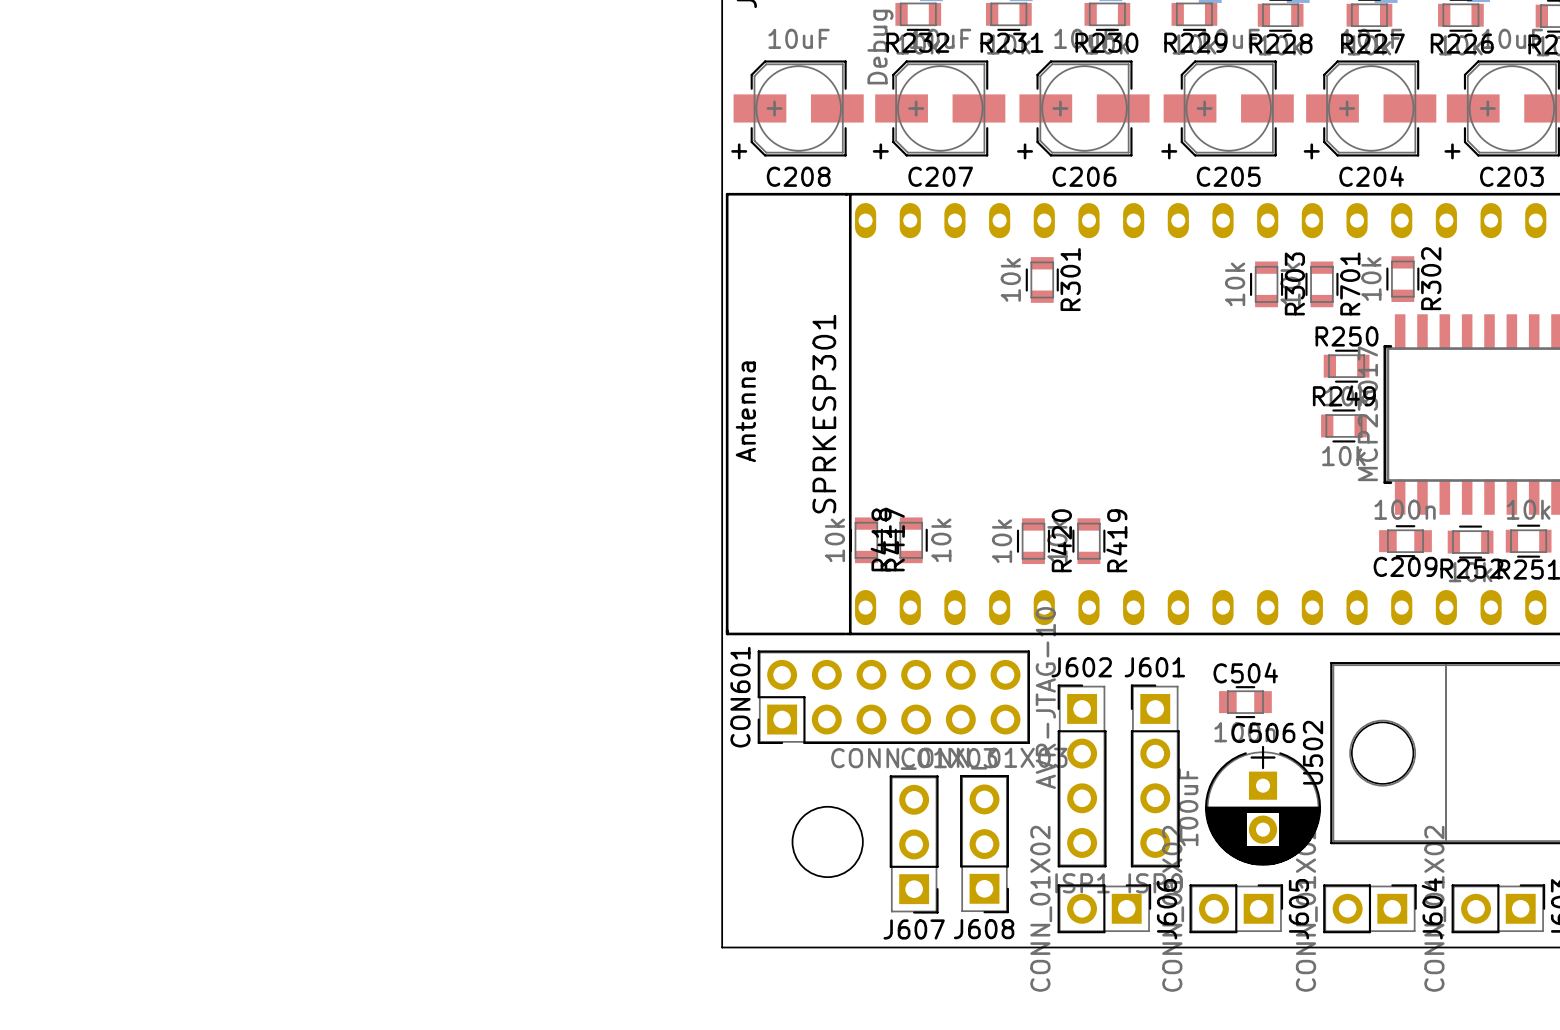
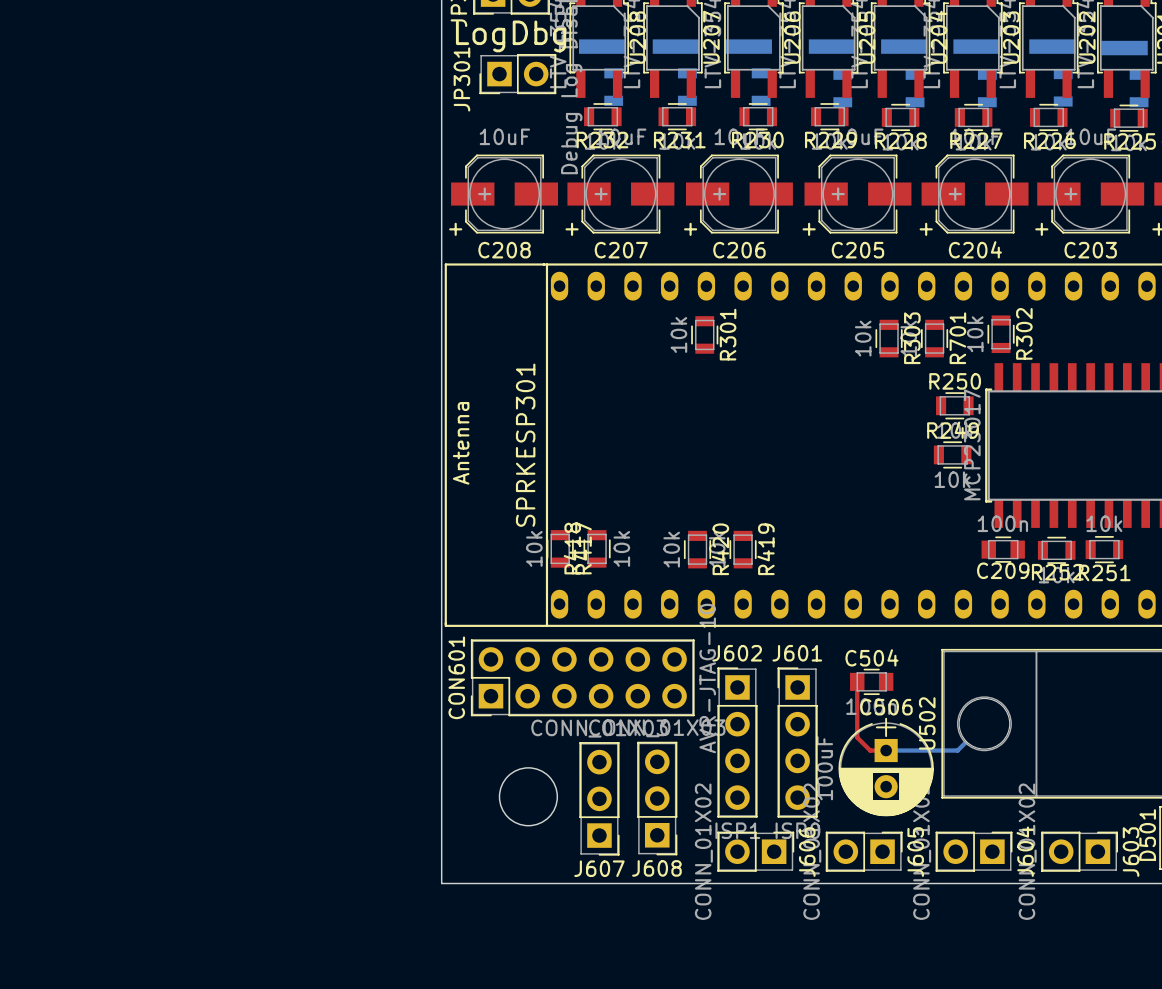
top track: none -> (857, 681) (857, 737) (870, 750) (886, 750)
bottom track: none -> (984, 723) (957, 750) (886, 750)

